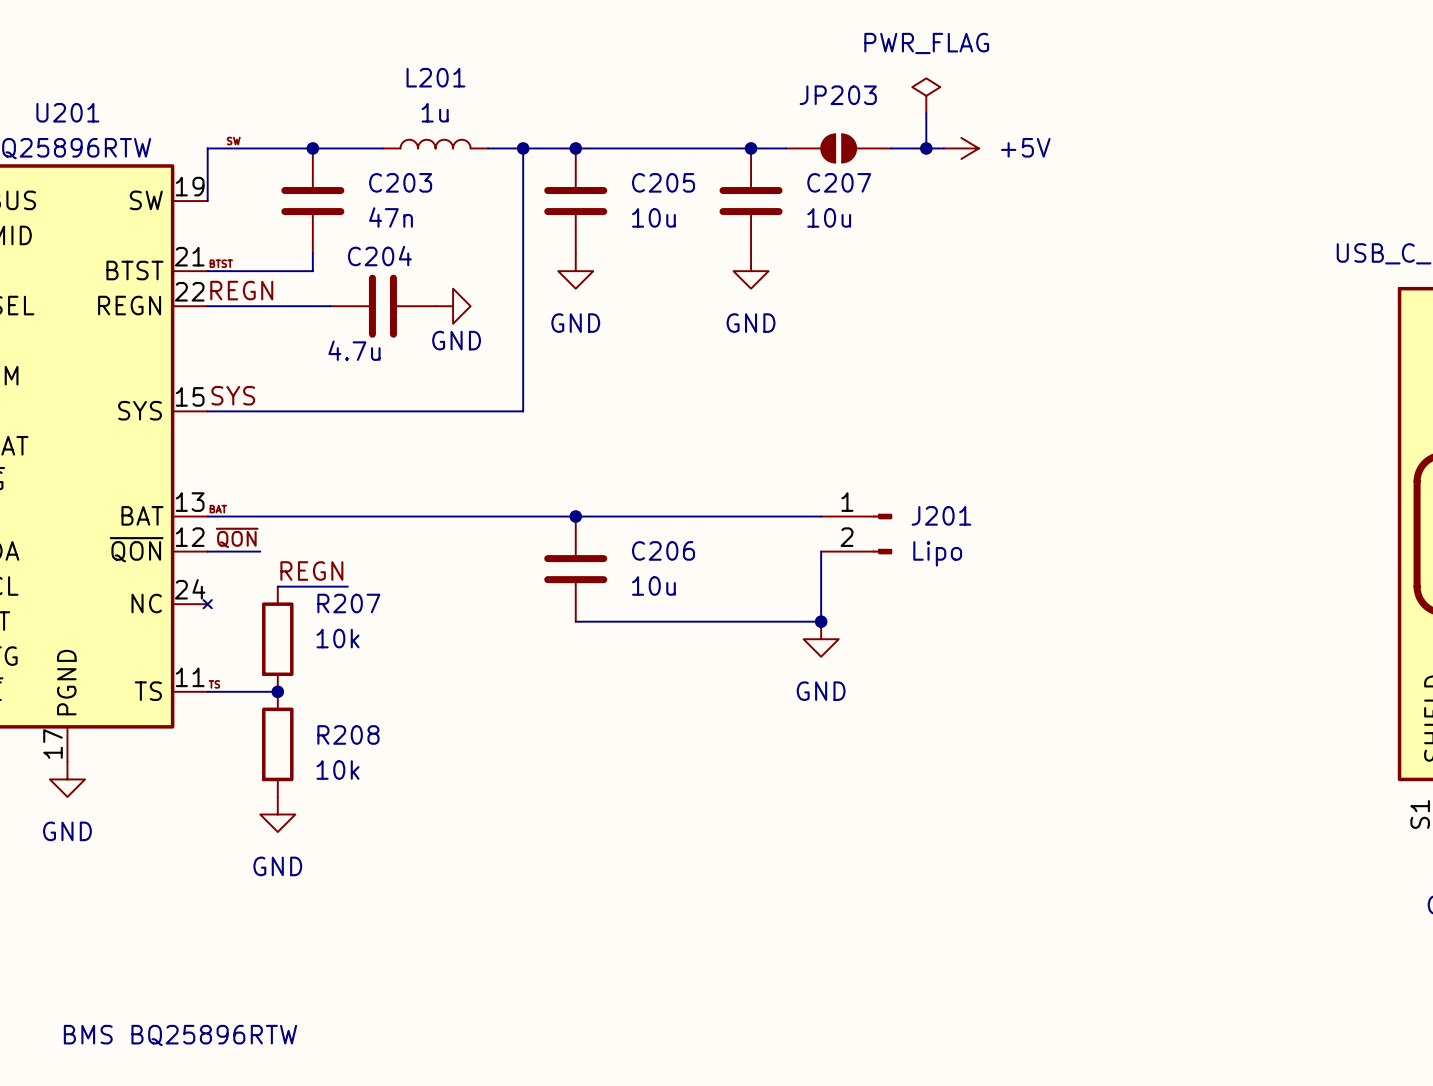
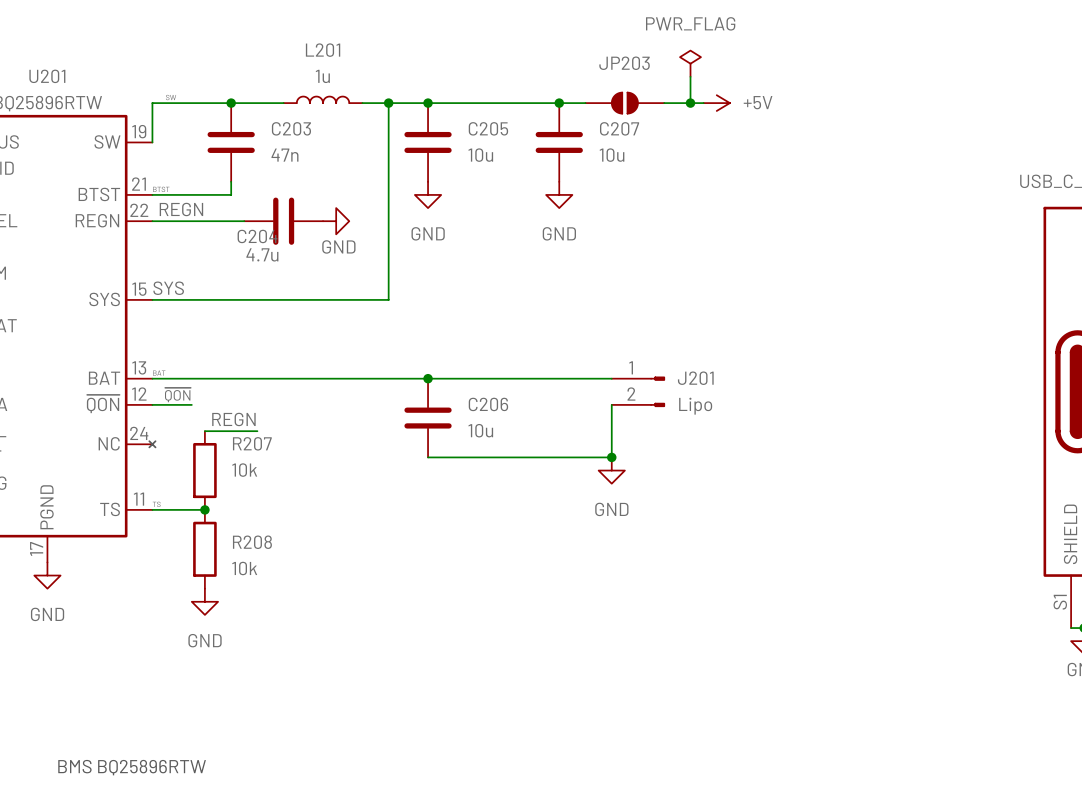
C204 name position: C204 (379, 256) -> C204 (257, 236)

